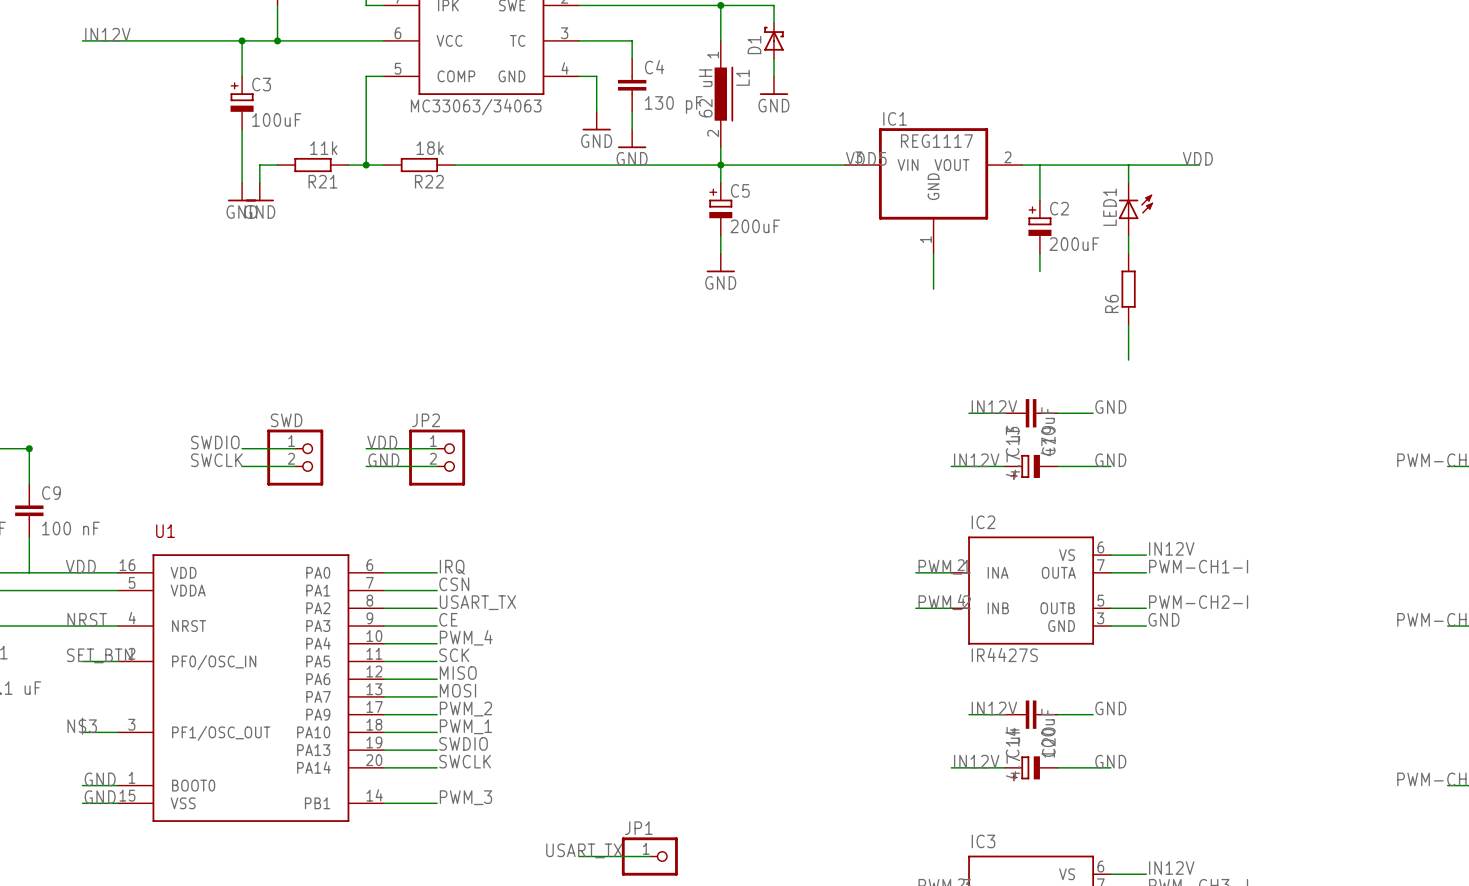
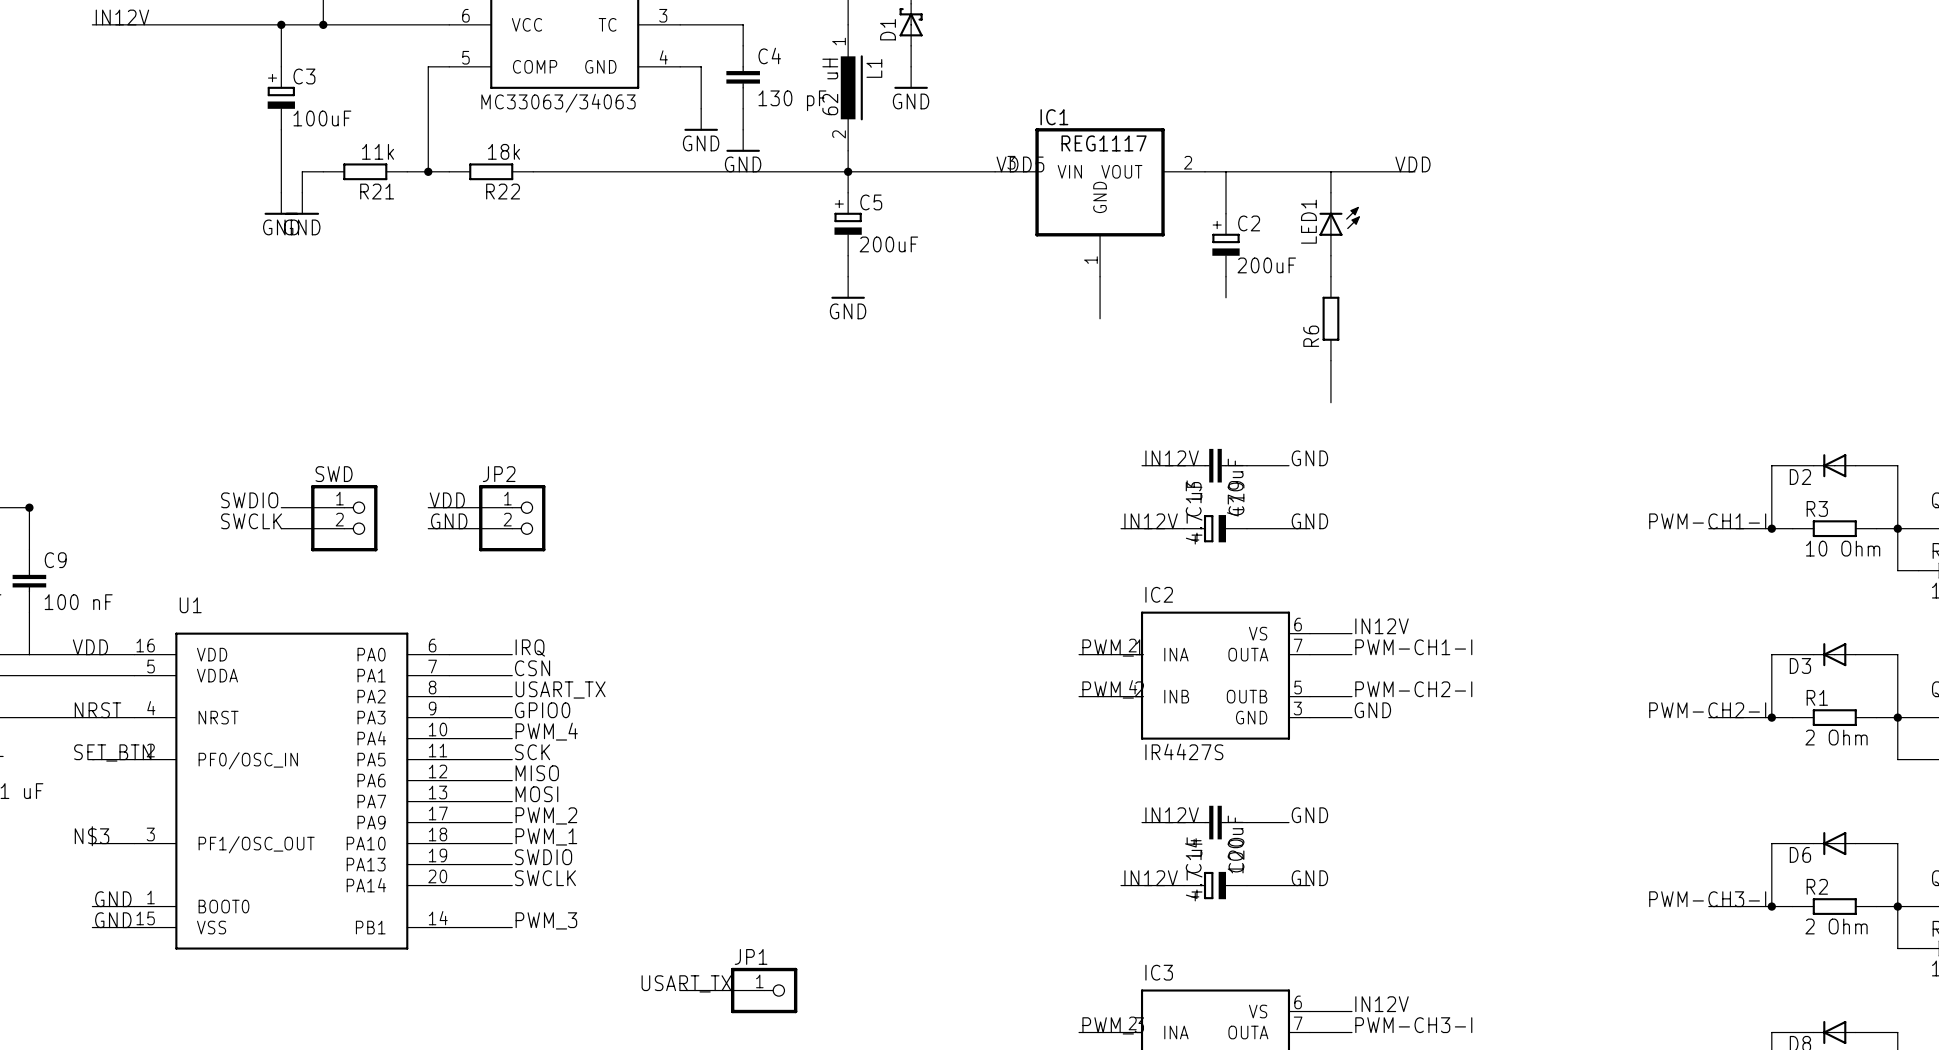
label: CE (448, 619) -> GPIO0 (542, 710)

